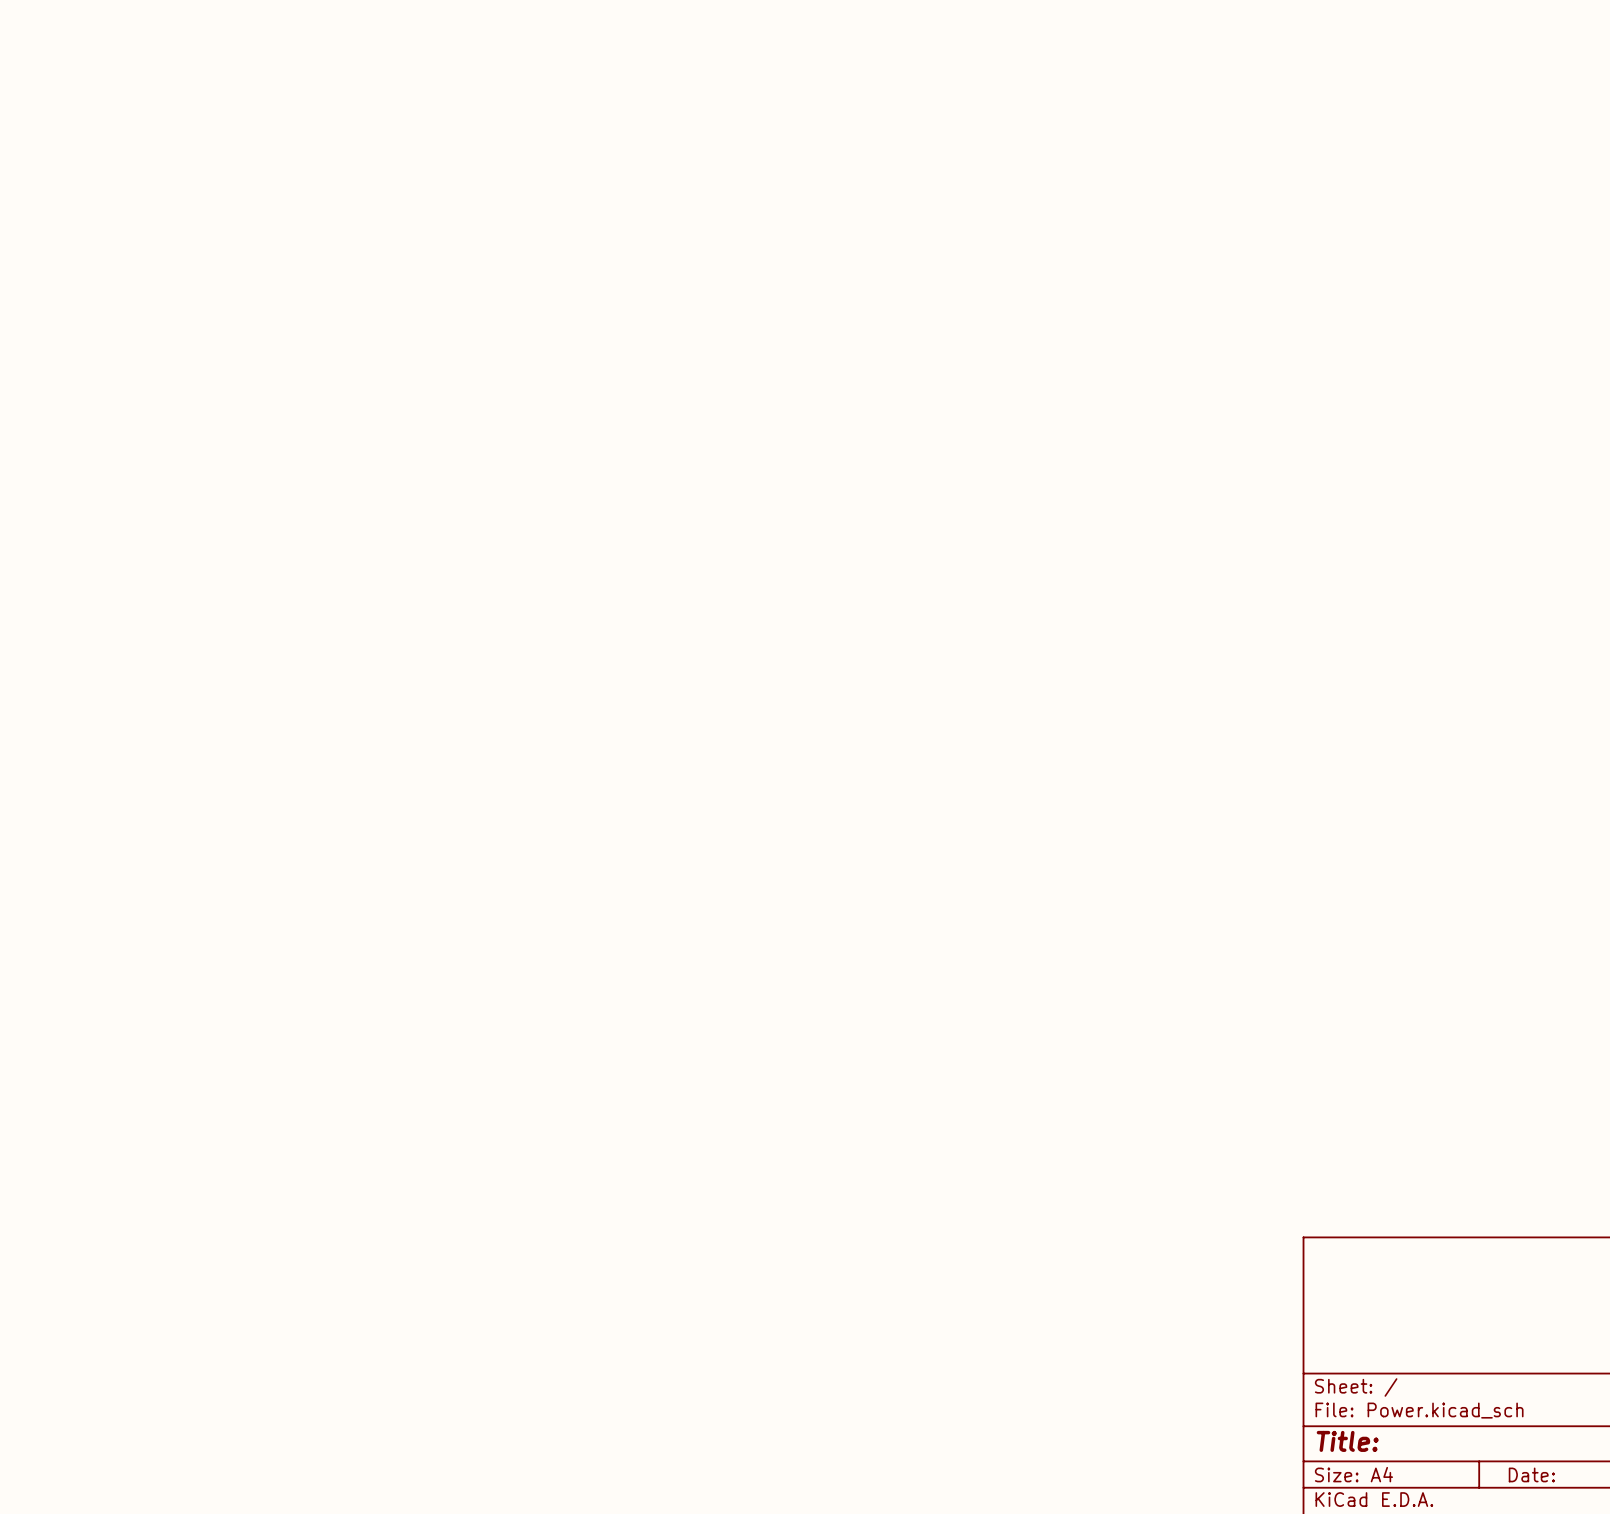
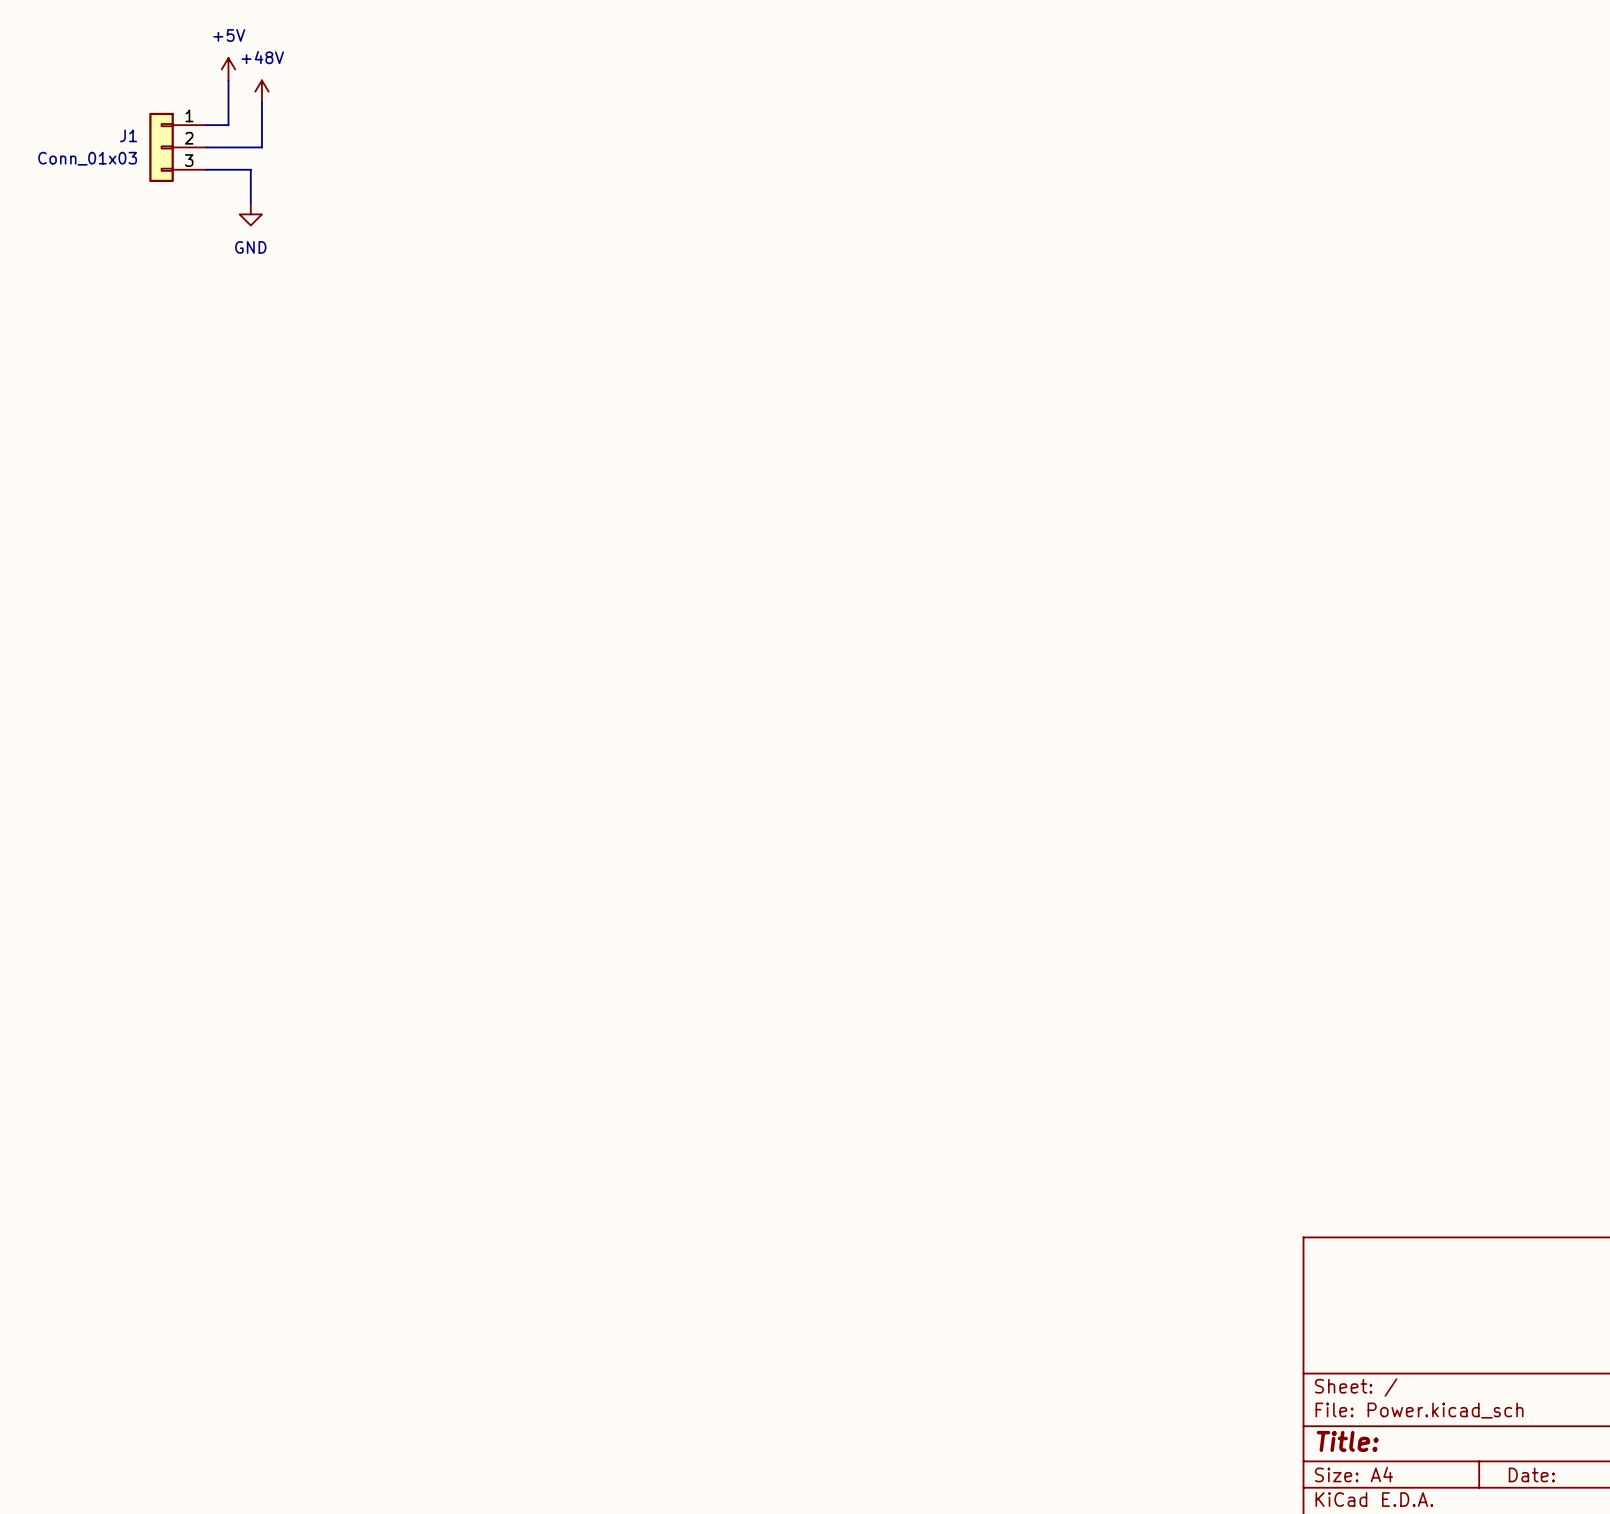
power symbol: none -> +5V (228, 69)
wire: none -> (228, 80) (228, 125) (206, 125)
power symbol: none -> +48V (261, 91)
wire: none -> (261, 102) (261, 147) (206, 147)
J1: none -> Conn_01x03 (177, 147)
wire: none -> (206, 169) (250, 169) (250, 203)
power symbol: none -> GND (250, 214)

